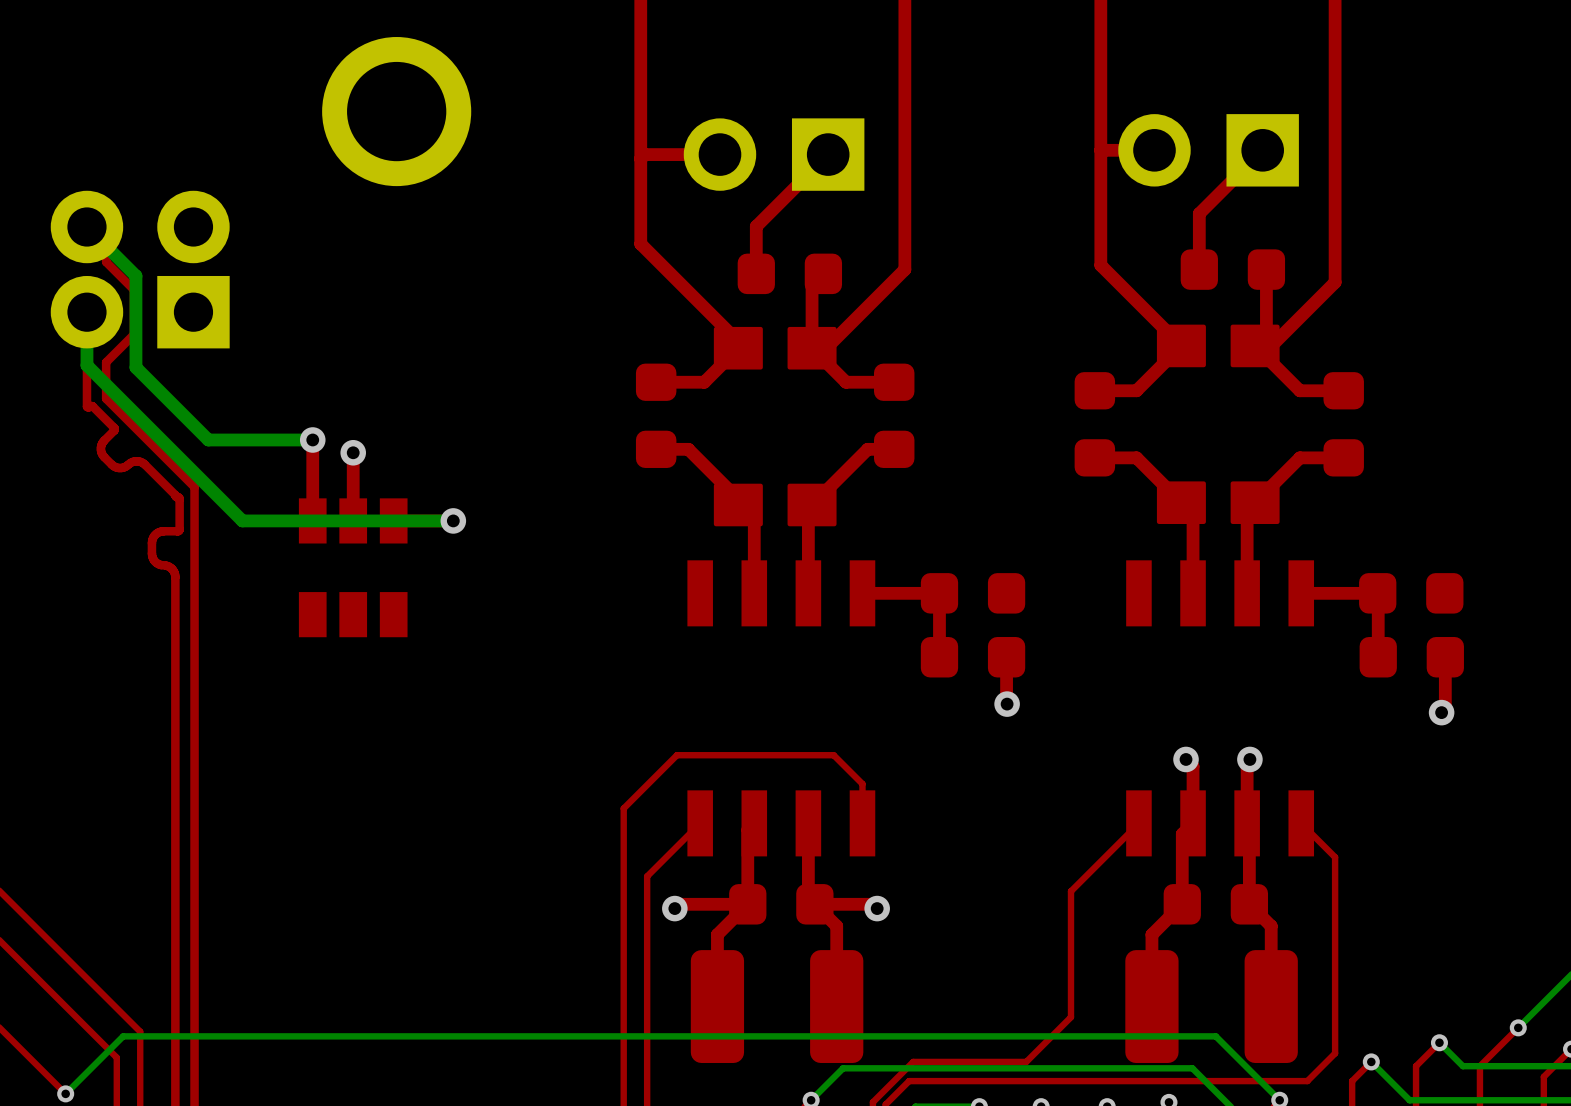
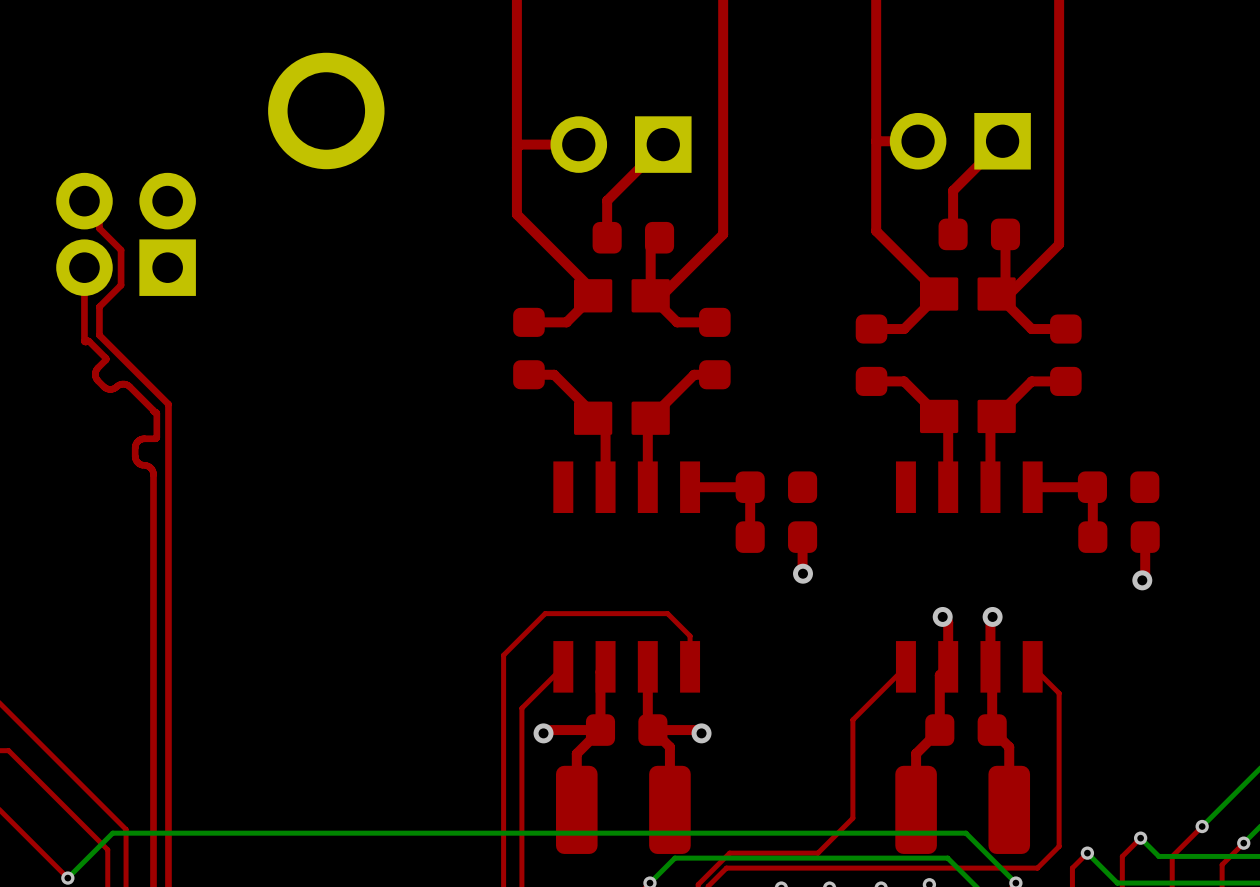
bottom track: (86, 226) (135, 275) (135, 367) (208, 439) (312, 439) -> none
bottom track: (86, 312) (86, 365) (242, 520) (453, 520) -> none
top track: (312, 439) (312, 520) -> none
via: (312, 439) -> none
top track: (353, 452) (353, 520) -> none
via: (353, 452) -> none
via: (453, 520) -> none
part: (353, 567) -> none

